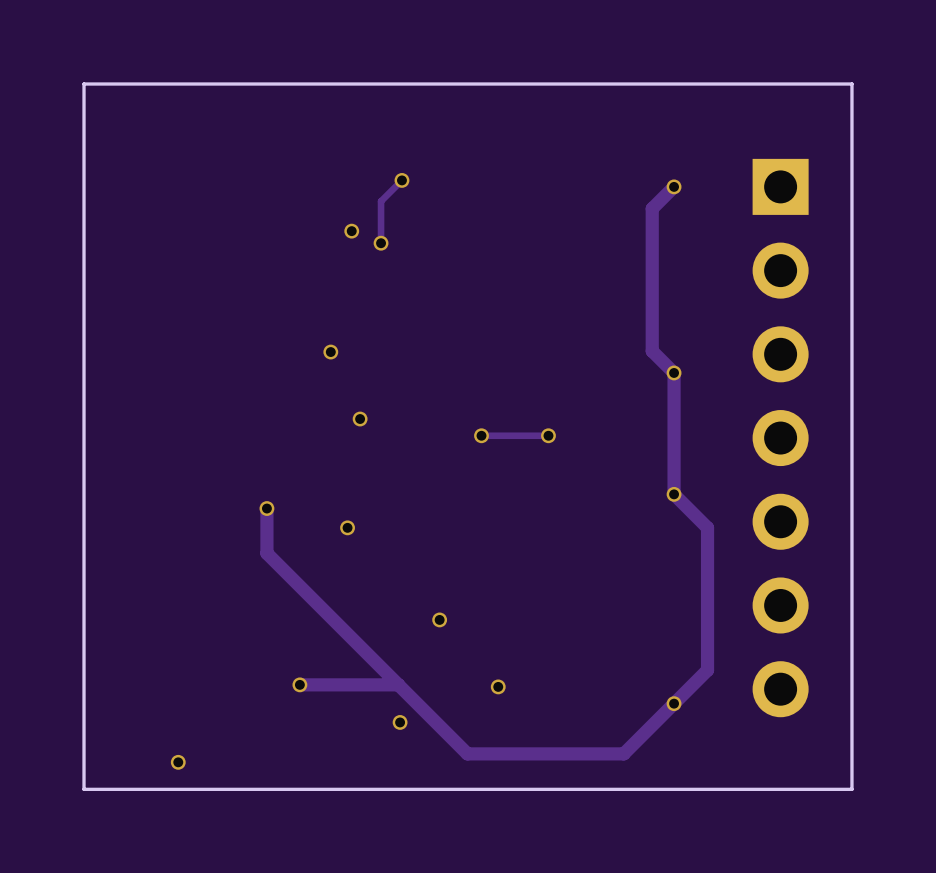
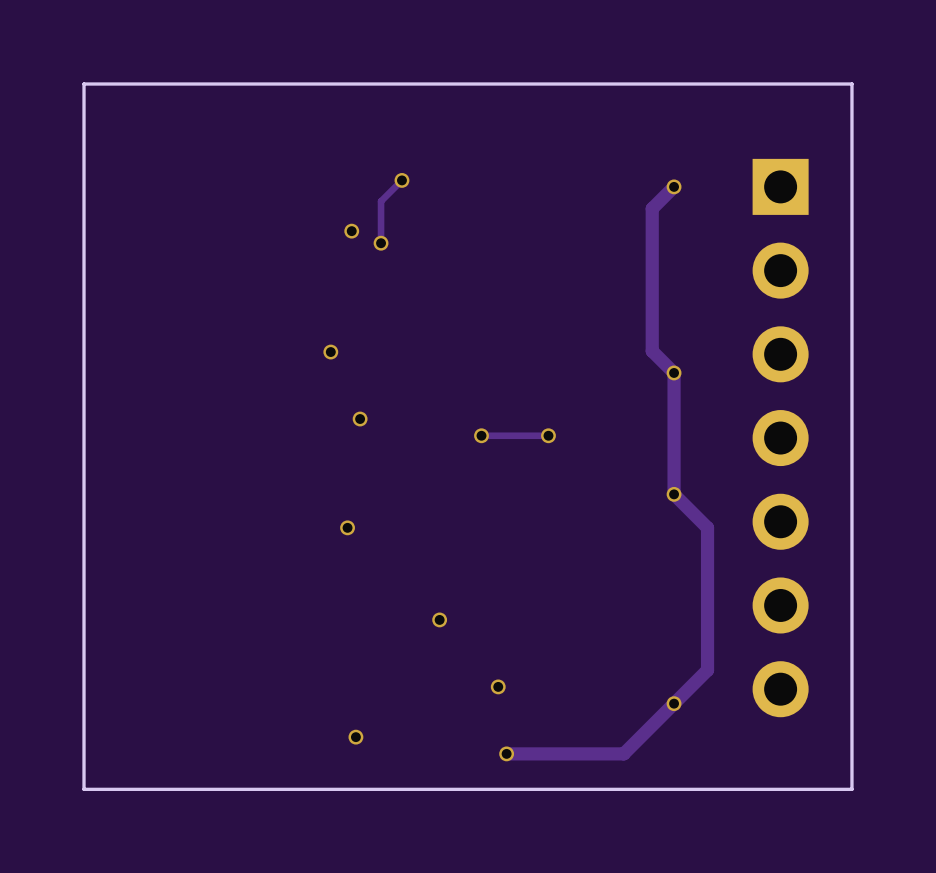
track: (266, 508) (266, 553) (467, 753) (506, 753) -> none
via: (266, 508) -> none
via: (299, 684) -> none
track: (398, 684) (299, 684) -> none
via: (400, 722) -> none
via: none -> (355, 737)
via: none -> (506, 753)
via: (178, 762) -> none

